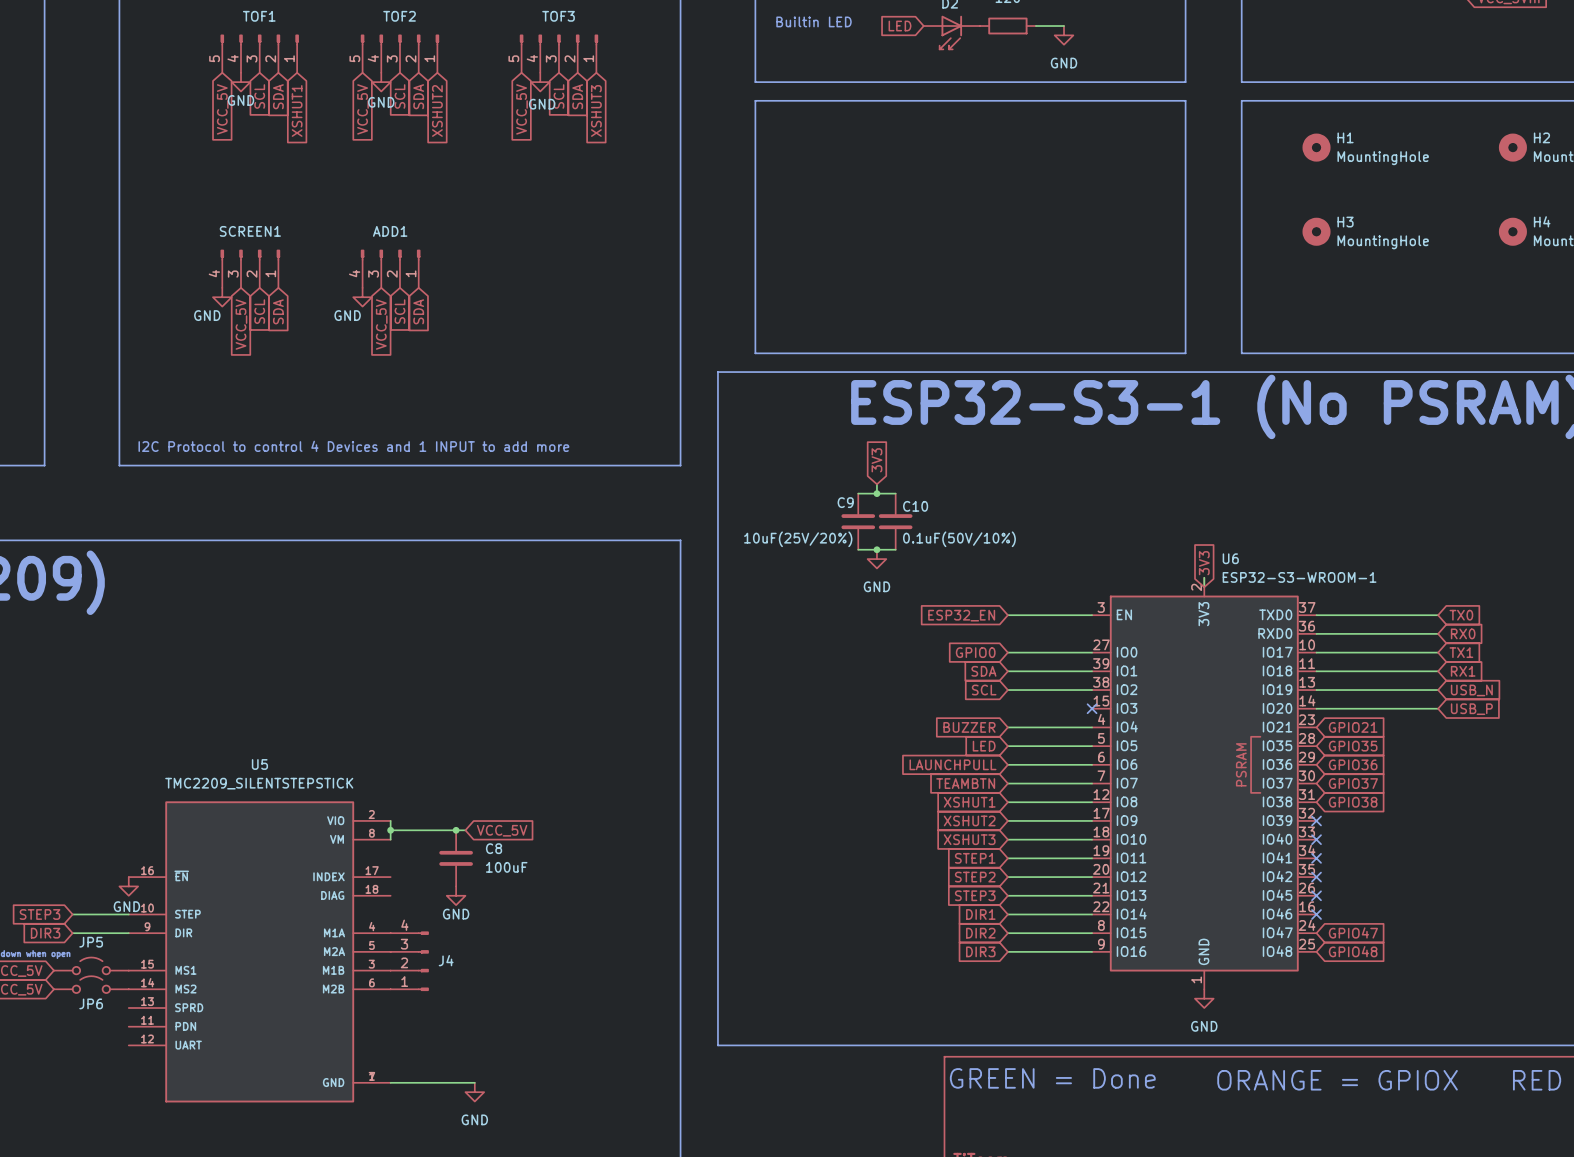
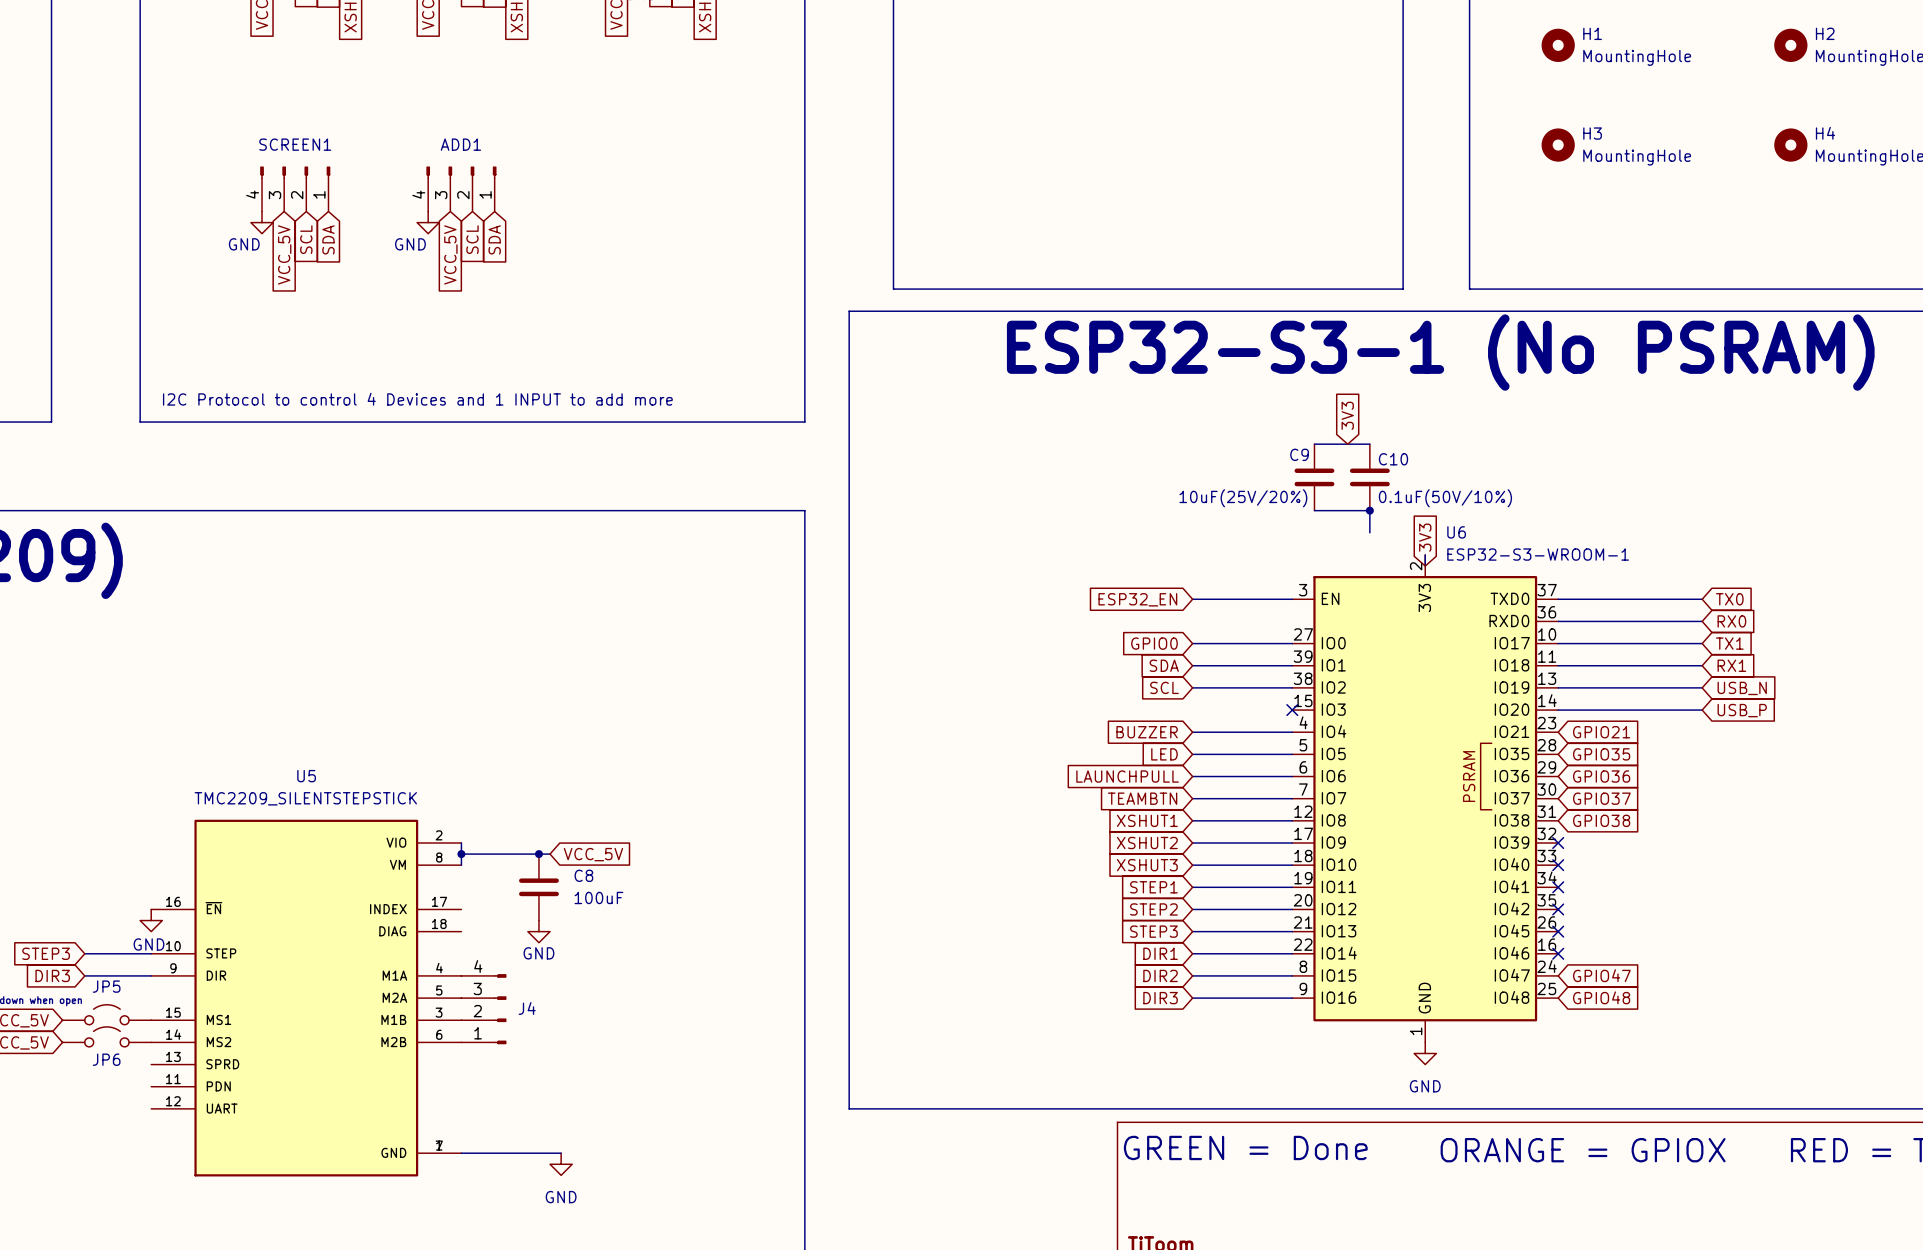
global label: 3V3 (876, 460) -> none
global label: none -> 3V3 (1347, 415)
wire: (876, 484) (876, 493) -> none
wire: none -> (1314, 444) (1369, 444)
wire: (858, 493) (895, 493) -> none
junction: (876, 493) -> none
C9 position: (858, 521) -> (1314, 477)
C10 position: (895, 521) -> (1369, 477)
wire: none -> (1314, 510) (1369, 510) (1369, 532)
junction: none -> (1369, 510)
wire: (858, 549) (895, 549) -> none
junction: (876, 549) -> none
power symbol: GND (876, 559) -> none

